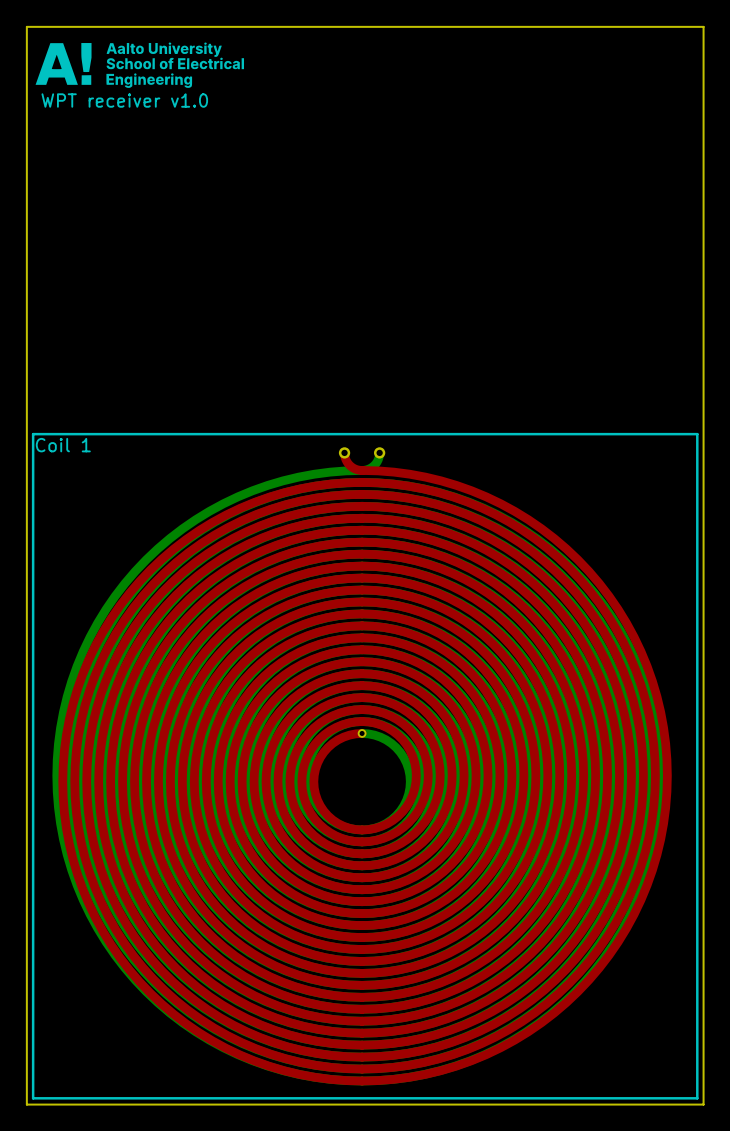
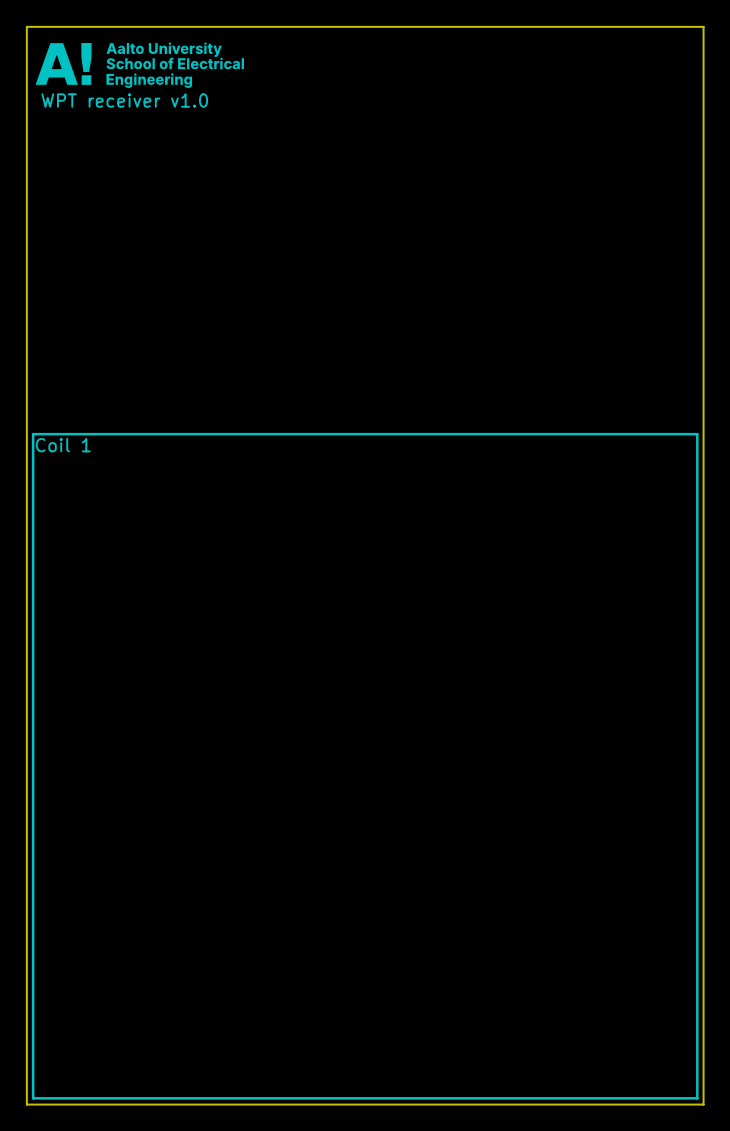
part: (362, 766) -> none

